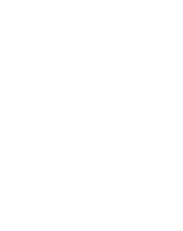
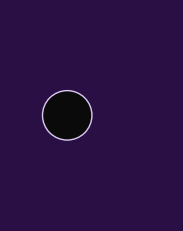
part: none -> (67, 115)

